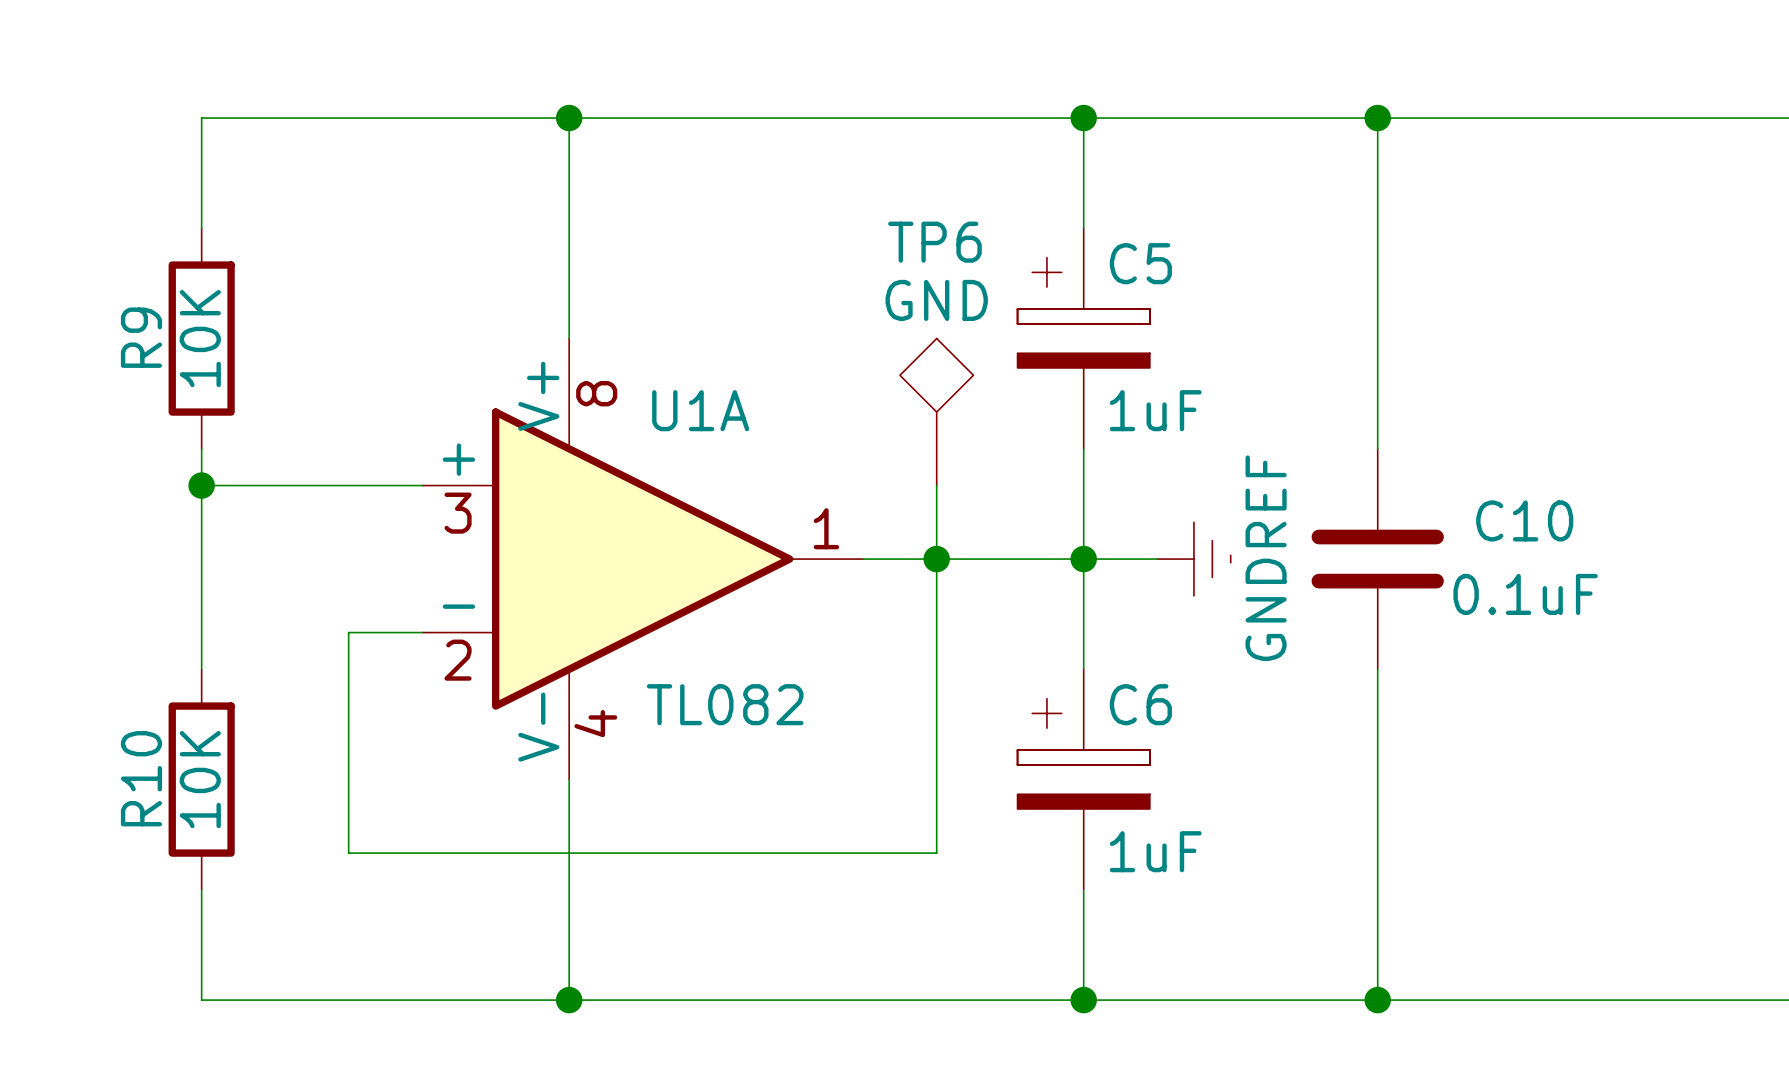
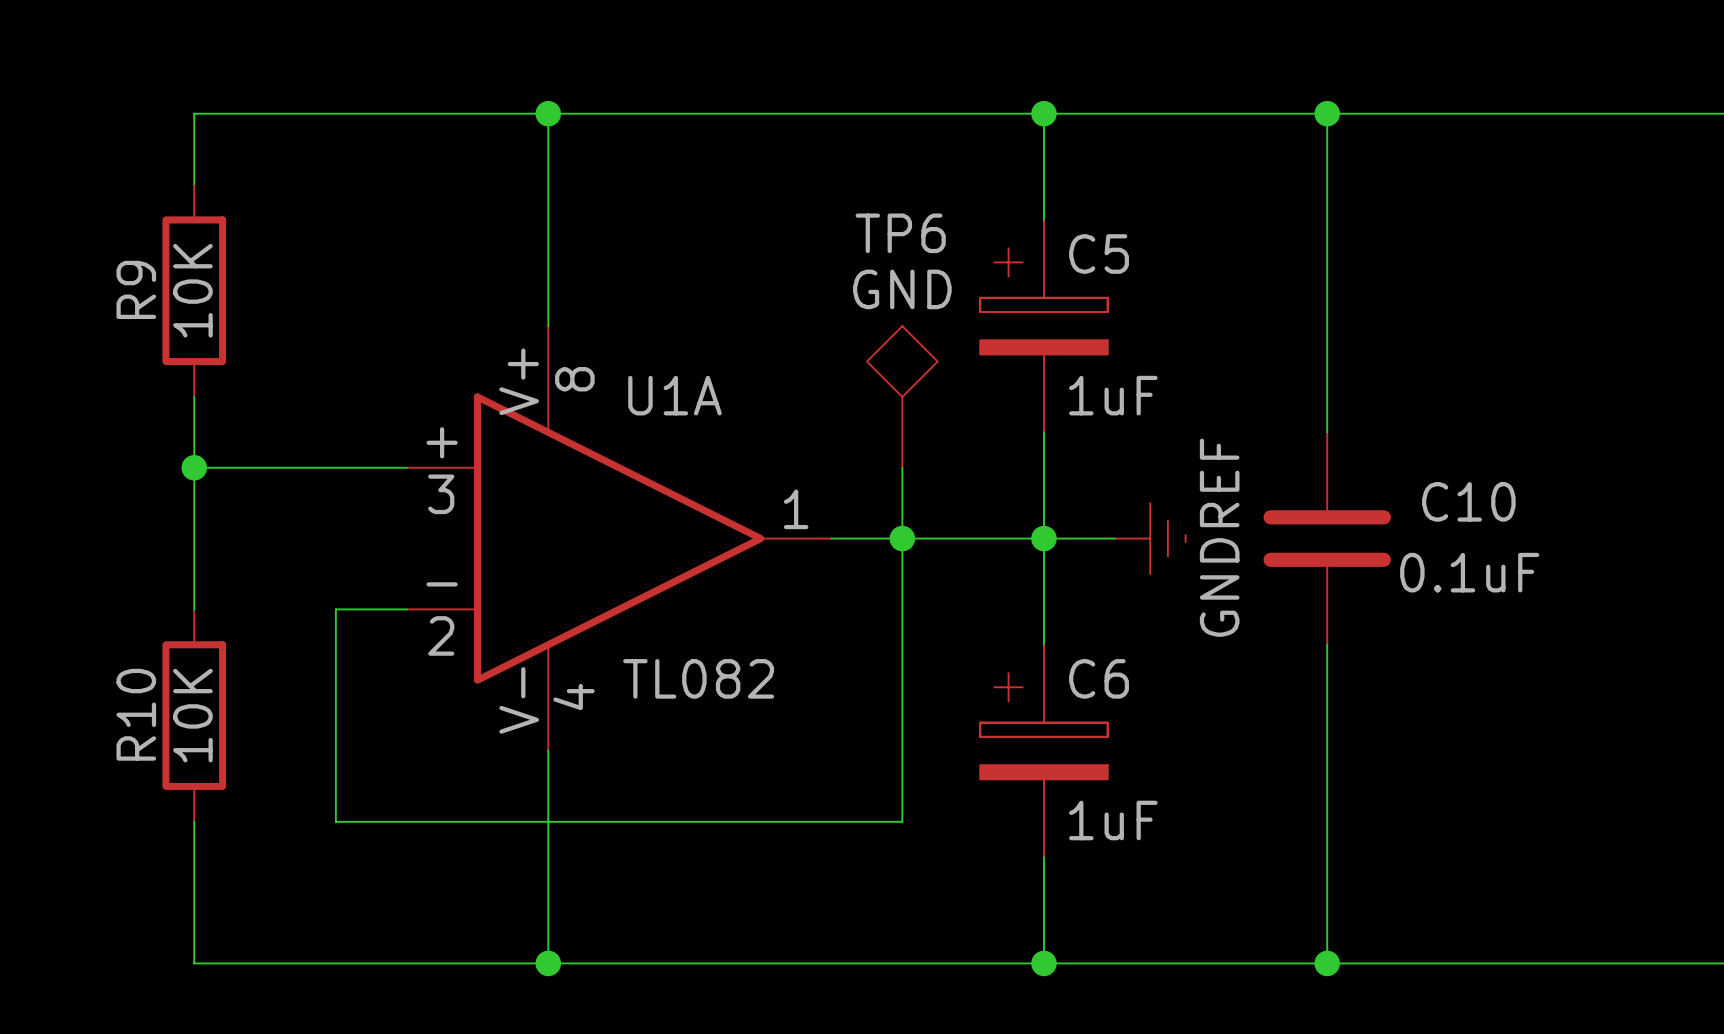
R9 position: (201, 338) -> (194, 290)
R10 position: (201, 779) -> (194, 715)

